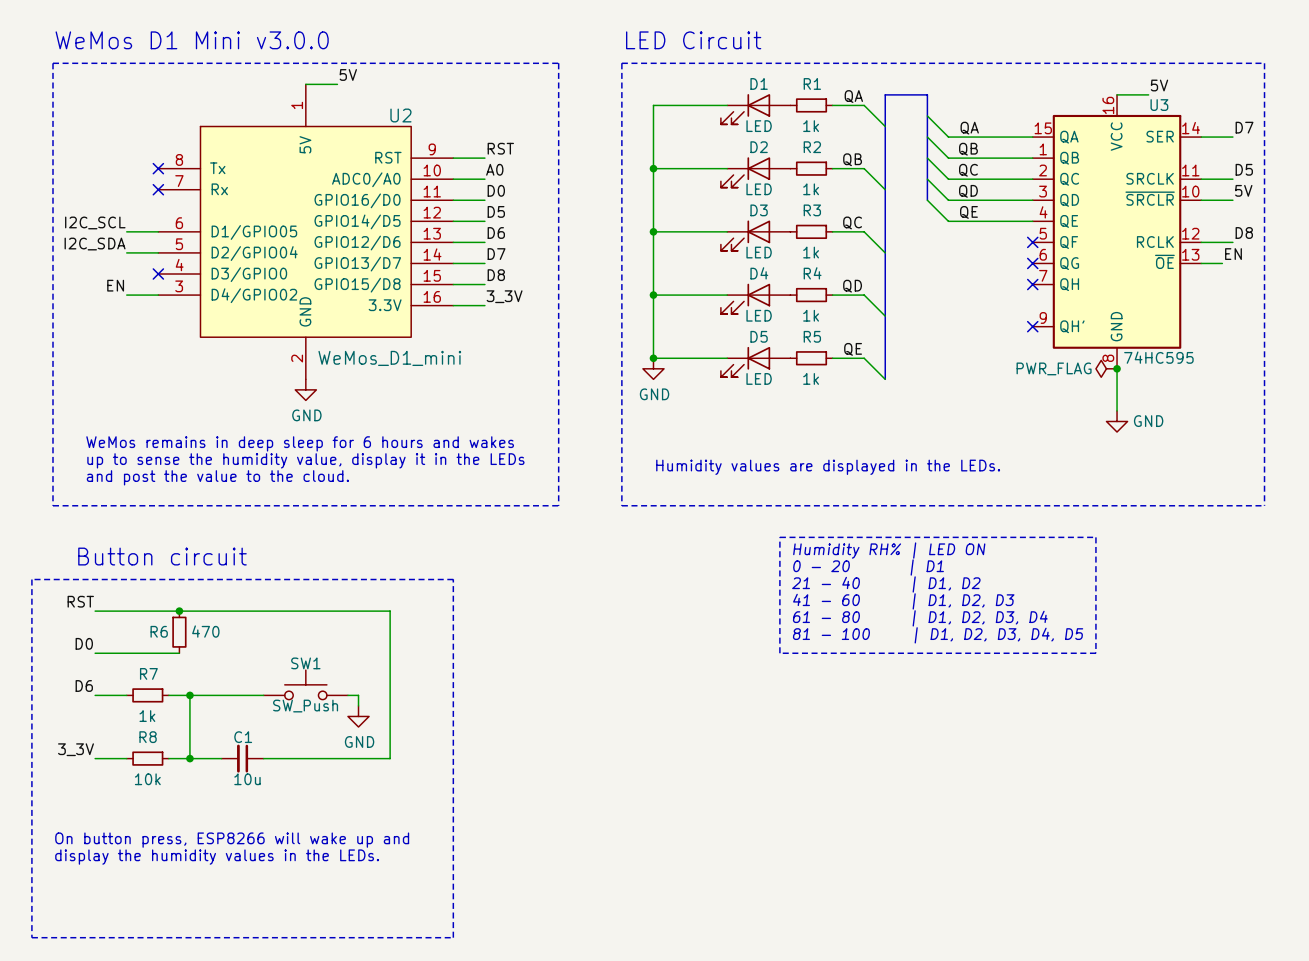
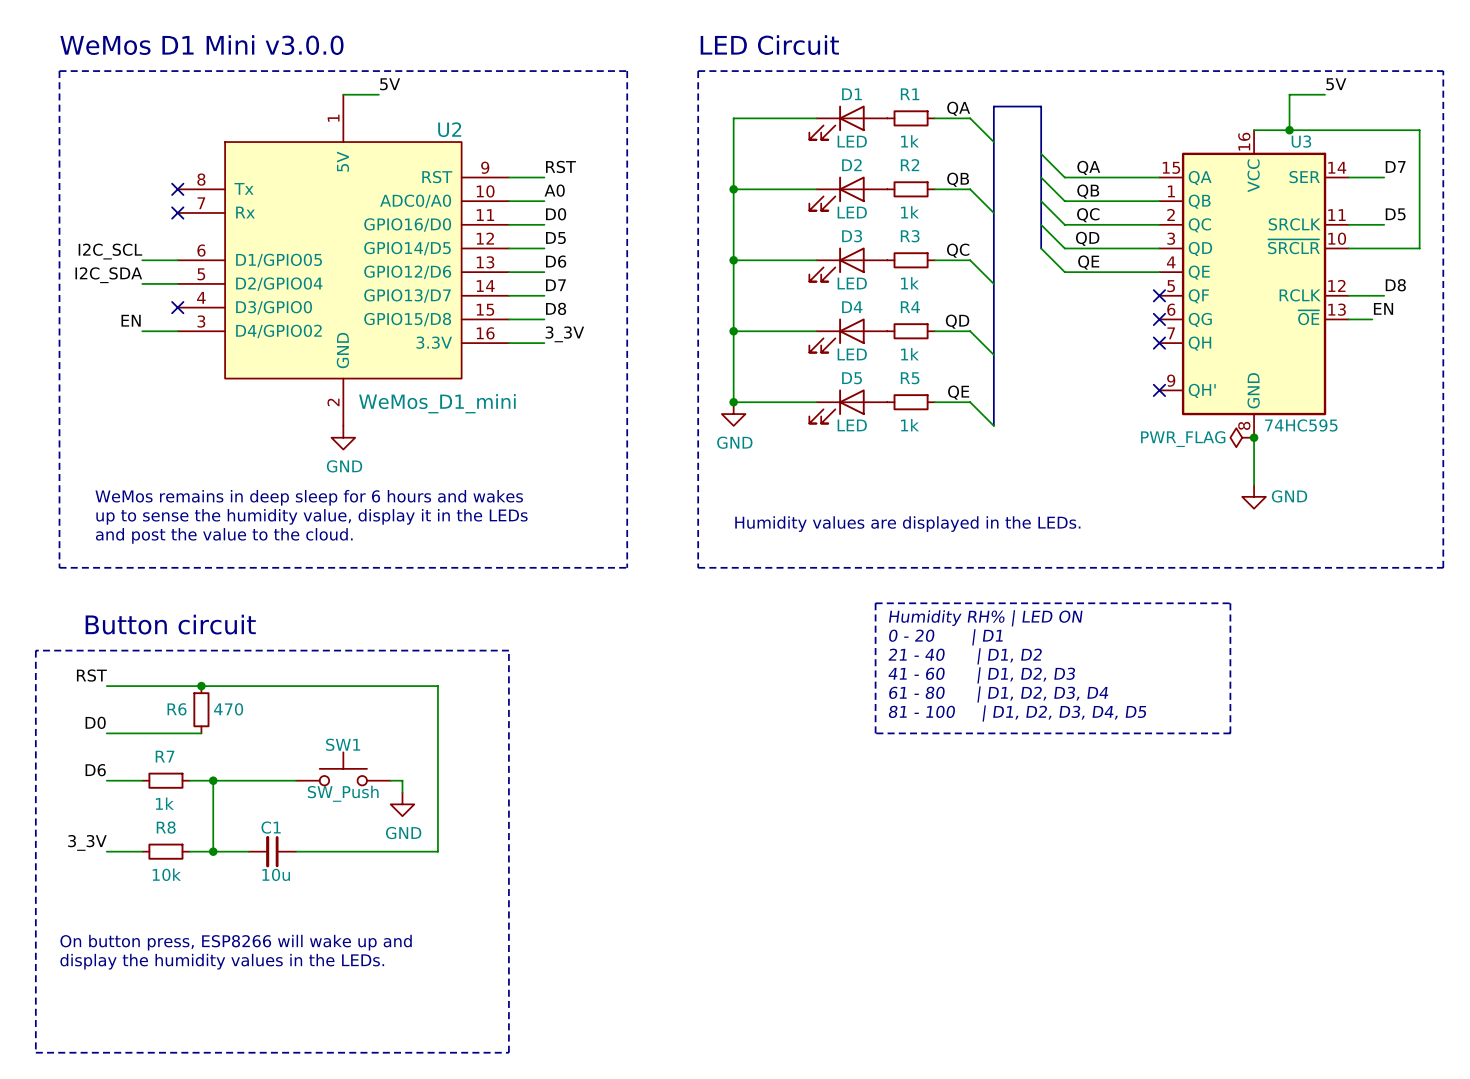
line: (1264, 63) (1264, 505) -> (1419, 71) (1443, 71) (1443, 567) (1419, 567)
wire: none -> (1325, 94) (1289, 94) (1289, 130)
label position: 5V (1159, 85) -> 5V (1336, 84)
wire: (1117, 94) (1148, 94) -> none
wire: (927, 115) (948, 137) (1032, 137) -> (1041, 248) (1064, 272) (1159, 272)
wire: none -> (1254, 130) (1419, 130) (1419, 248) (1348, 248)
junction: none -> (1289, 130)
label position: D7 (1244, 127) -> D7 (1395, 166)
label: QA (969, 128) -> none
wire: (1201, 137) (1232, 137) -> (1348, 177) (1384, 177)
label: QB (968, 149) -> QA (1088, 167)
label: D5 (1244, 169) -> none
label: QC (968, 170) -> QB (1088, 191)
wire: (1201, 179) (1232, 179) -> none
label: 5V (1243, 190) -> D5 (1395, 214)
label: QD (968, 191) -> QC (1088, 215)
bus: none -> (1041, 224) (1041, 248)
label: QE (968, 212) -> QD (1087, 238)
U3 position: (1117, 231) -> (1254, 283)
label position: D8 (1244, 232) -> D8 (1395, 285)
label: none -> QE (1088, 262)
no-connect mark: (1032, 242) -> none
wire: (1201, 242) (1232, 242) -> none
label position: EN (1233, 254) -> EN (1383, 308)
wire: none -> (1372, 295) (1384, 295)
wire: none -> (1348, 319) (1372, 319)
no-connect mark: none -> (1159, 343)
no-connect mark: (1032, 326) -> none
no-connect mark: none -> (1159, 390)
power symbol position: PWR_FLAG (1106, 368) -> PWR_FLAG (1242, 437)
junction position: (1117, 368) -> (1254, 437)
power symbol position: GND (1117, 421) -> GND (1254, 496)

